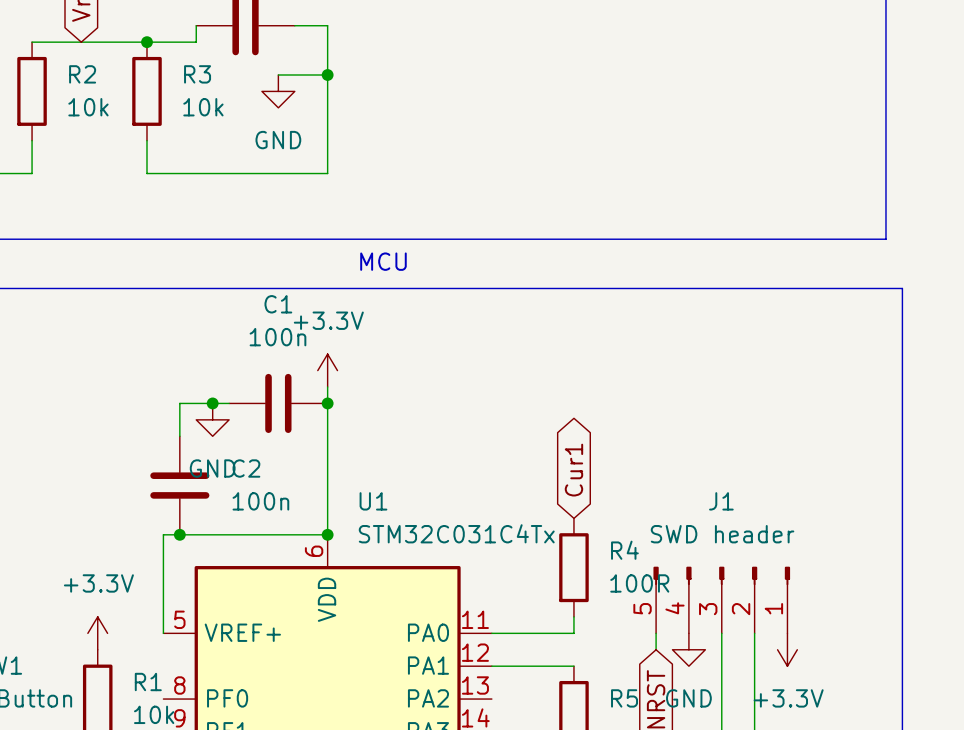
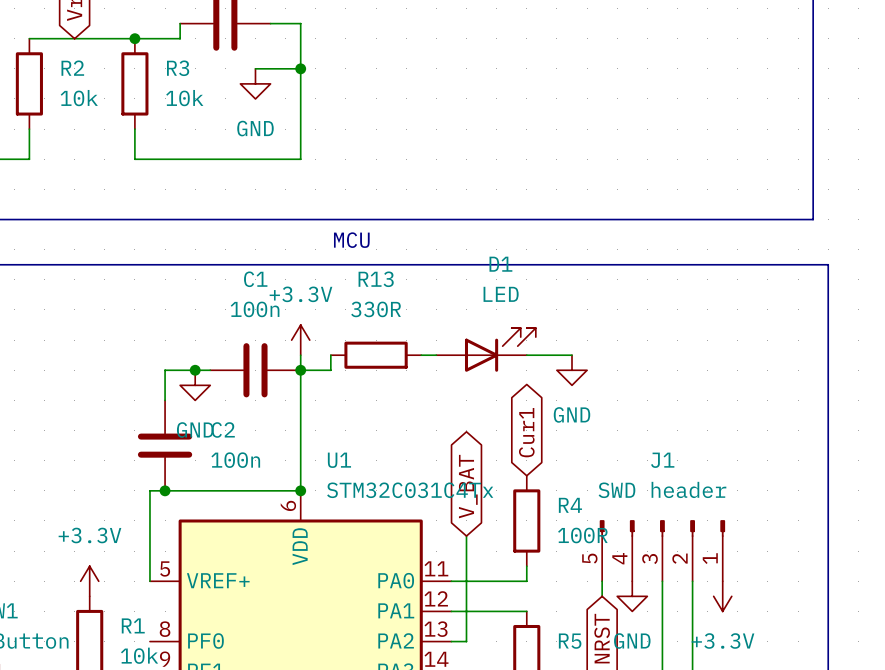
D1: none -> LED (486, 349)
wire: none -> (330, 355) (330, 370) (300, 370)
R13: none -> 330R (376, 355)
wire: none -> (421, 355) (436, 355)
wire: none -> (526, 355) (571, 355)
power symbol: none -> GND (571, 370)
global label: none -> V_BAT (468, 486)
wire: none -> (466, 536) (466, 641) (451, 641)

